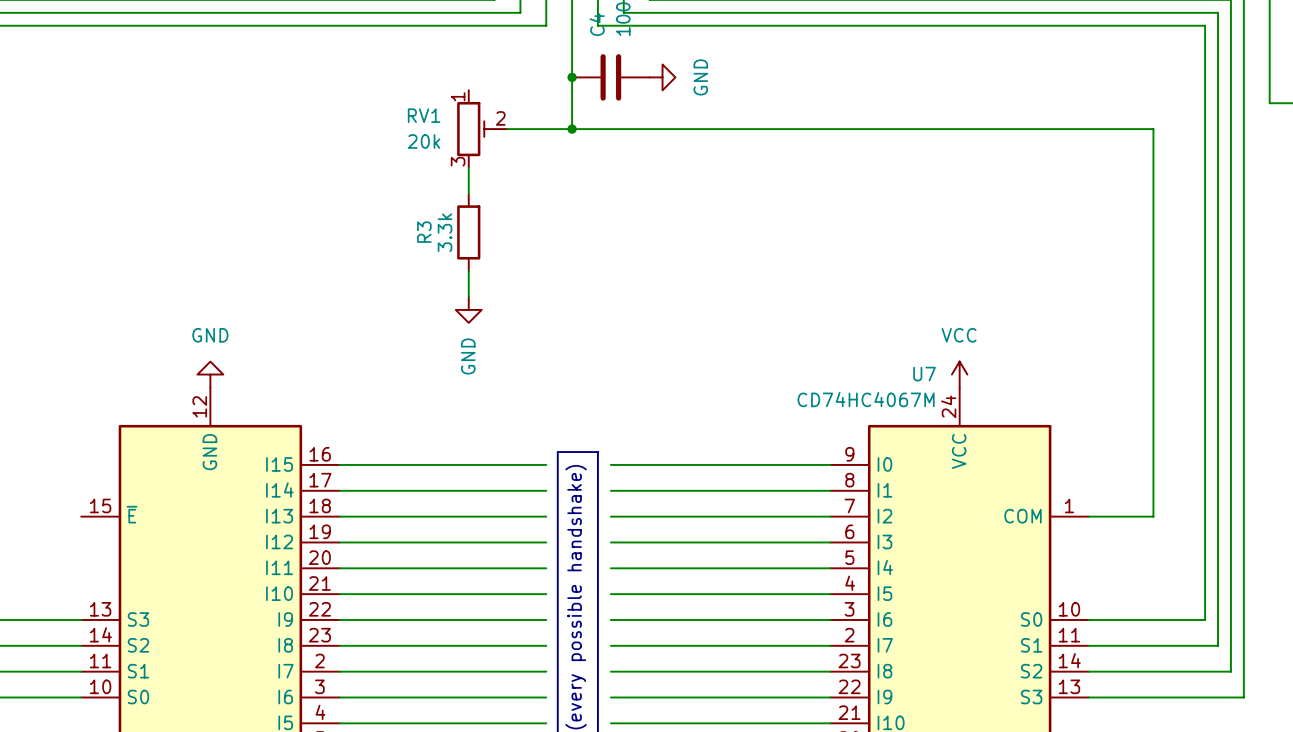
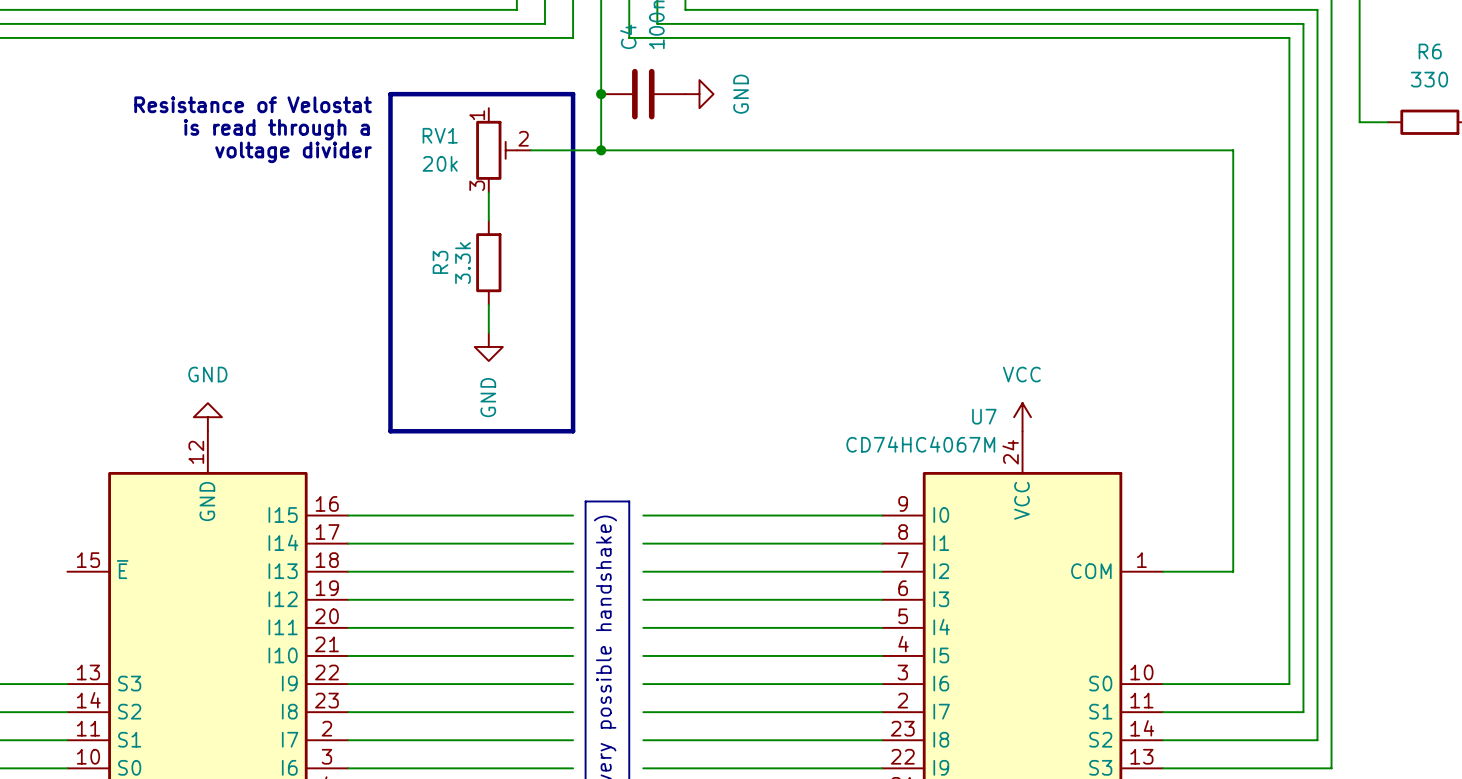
line: none -> (390, 94) (573, 94) (573, 431) (390, 431) (390, 94)
text: none -> Resistance of Velostat (253, 104)
text: none -> is read through a (276, 129)
text: none -> voltage divider (293, 152)

